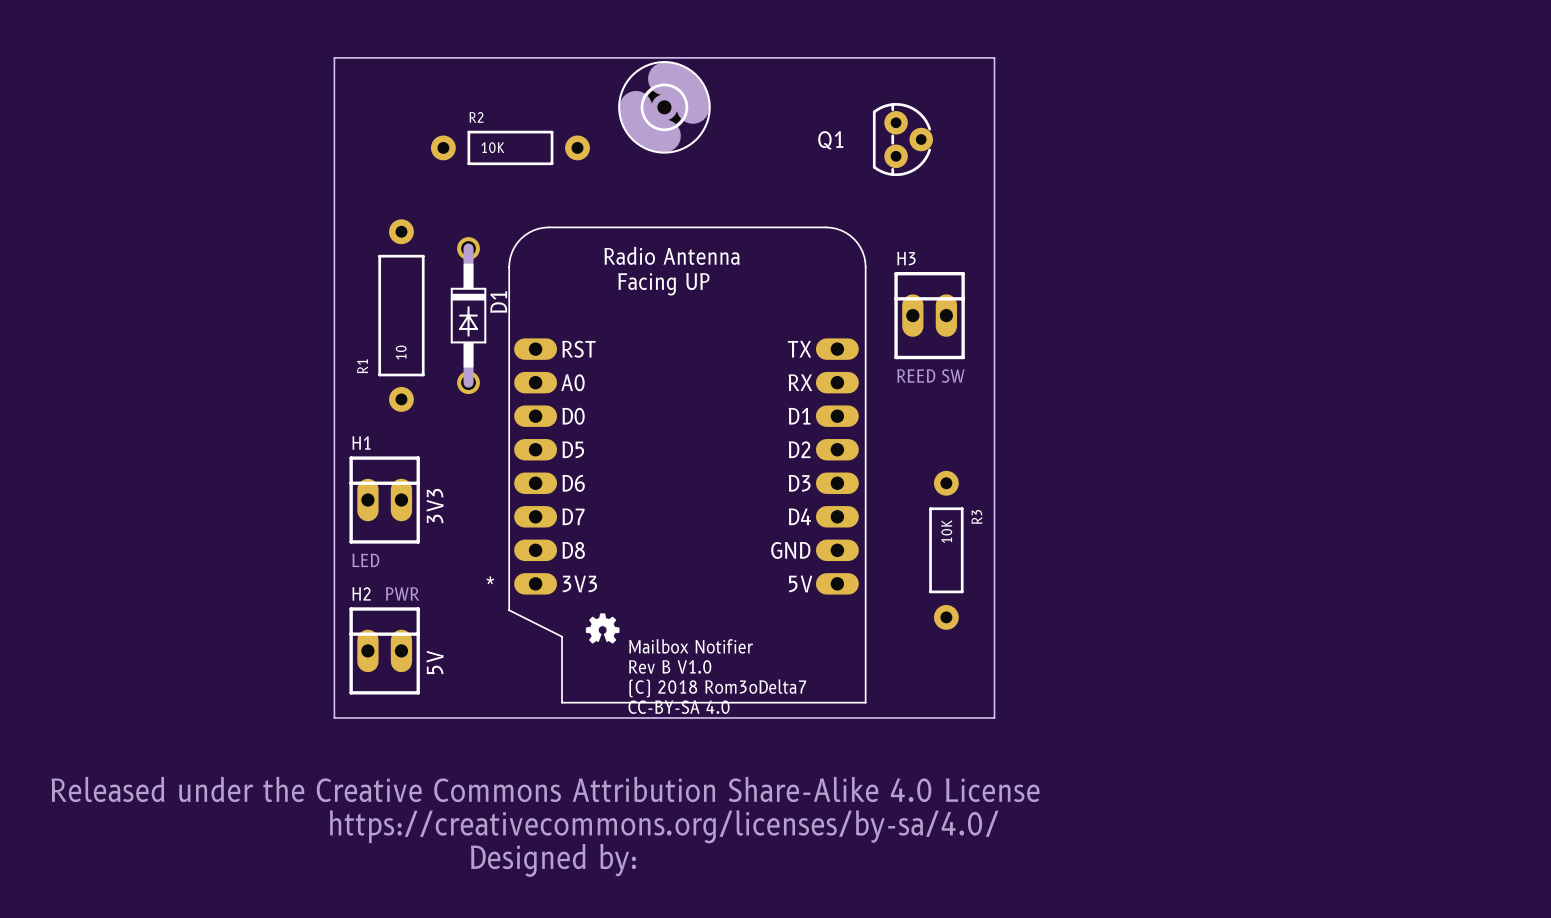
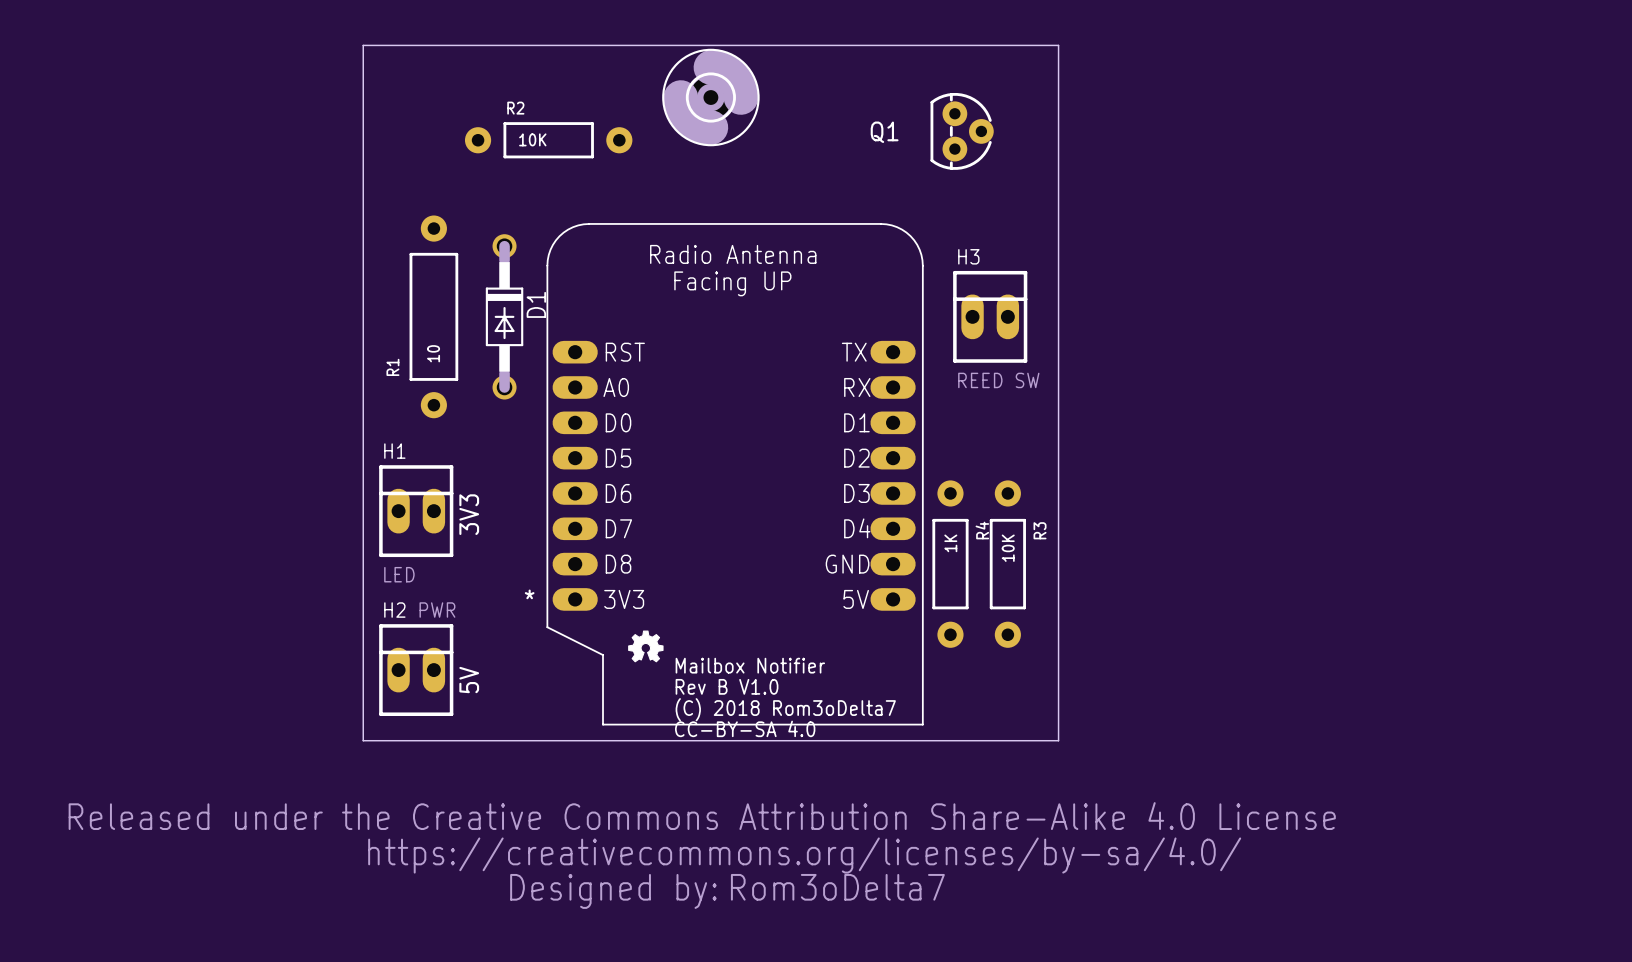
R4: none -> 1K (950, 564)
text: none -> Rom3oDelta7 (837, 887)

